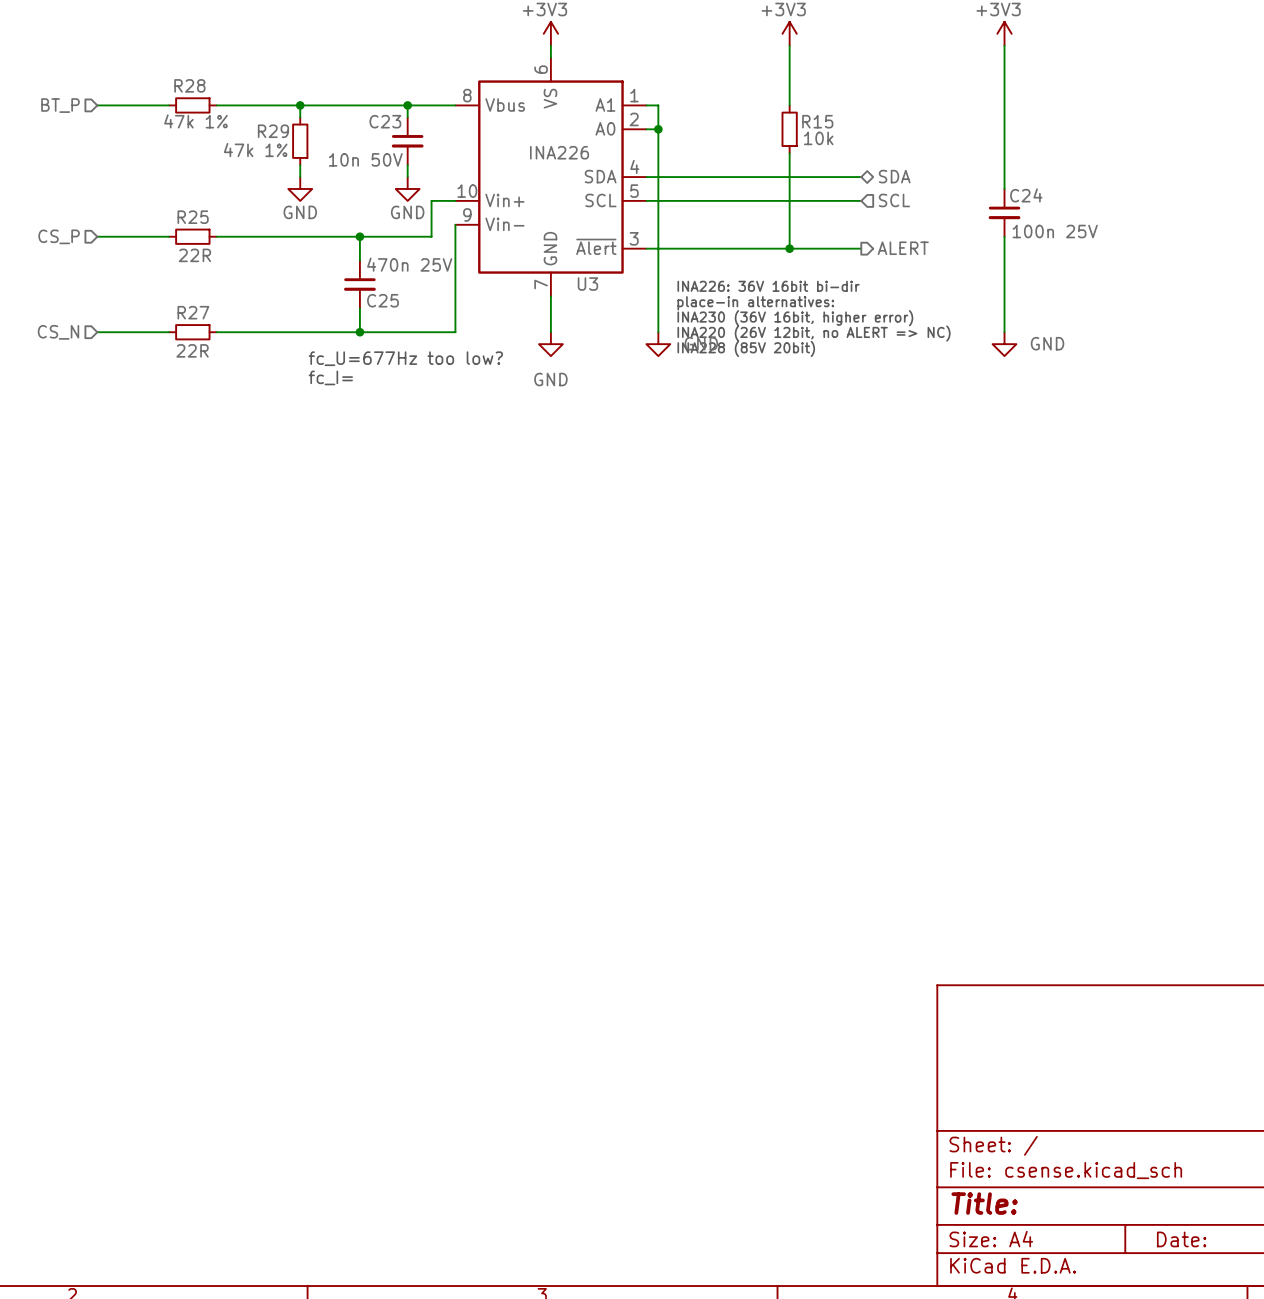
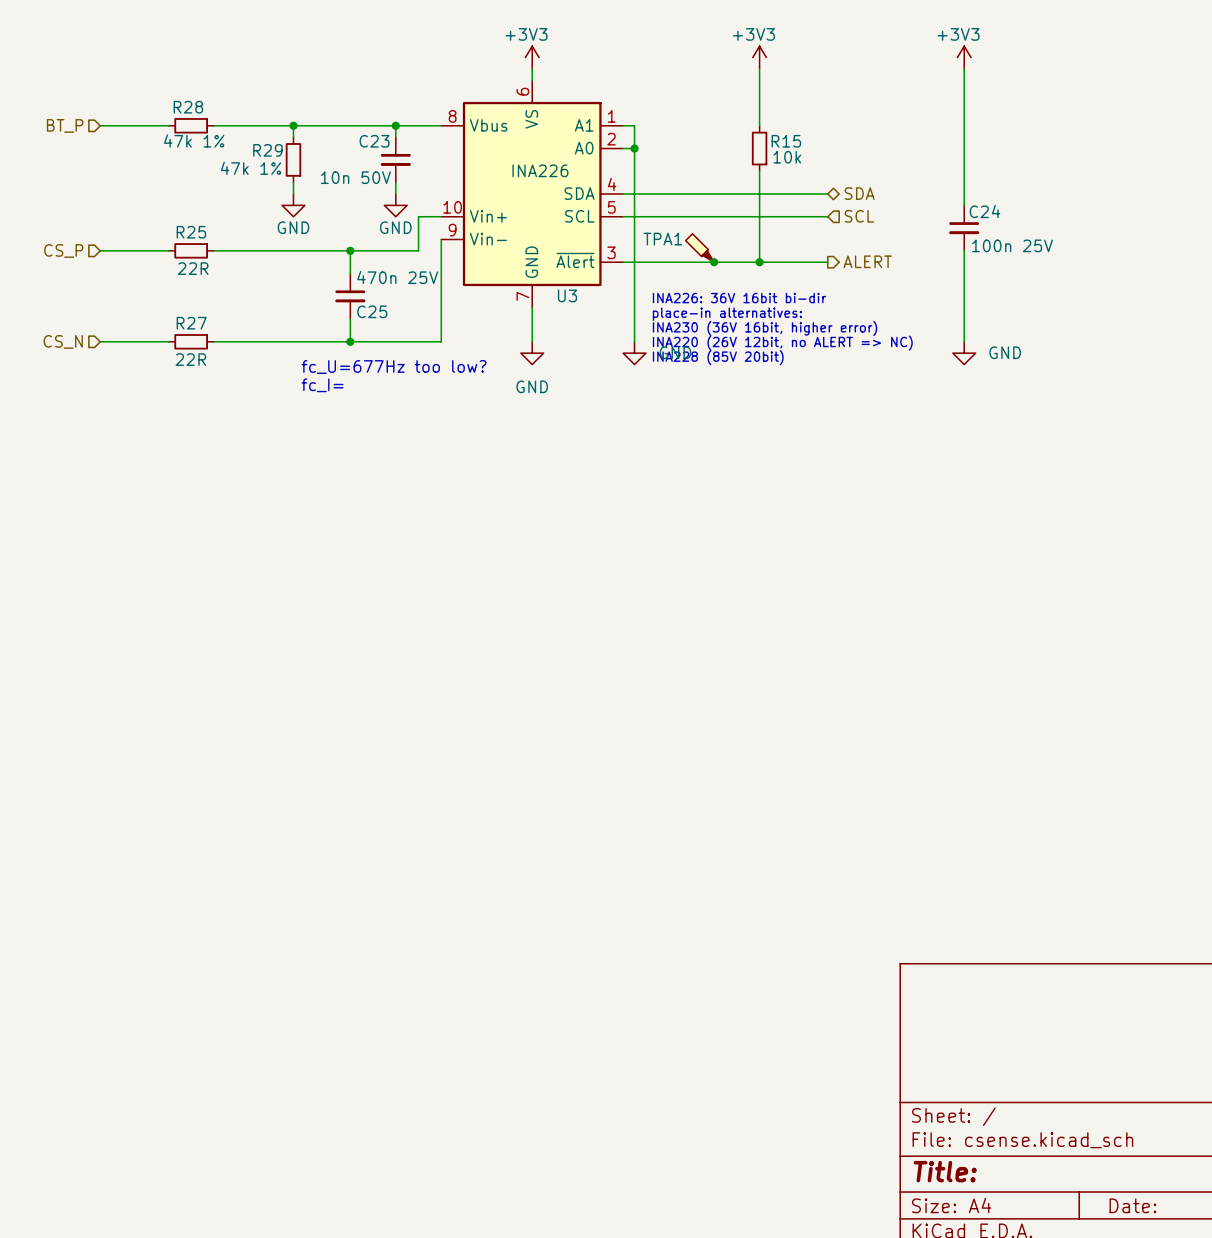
TPA1: none -> (699, 248)
junction: none -> (714, 262)

